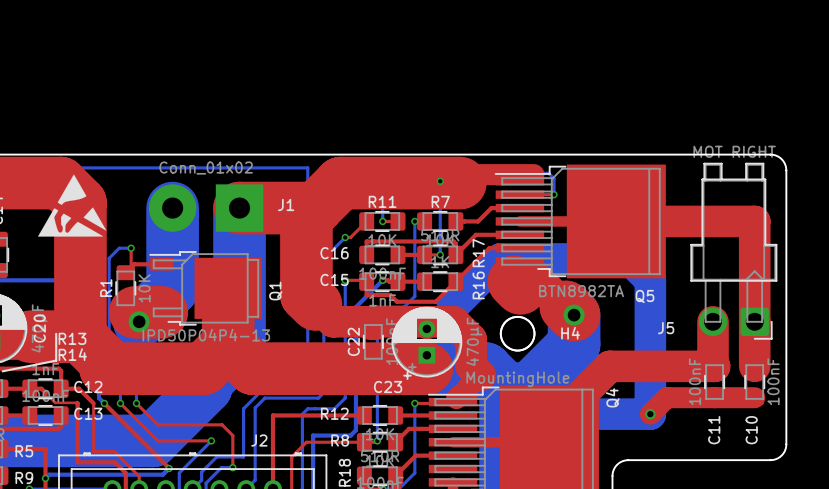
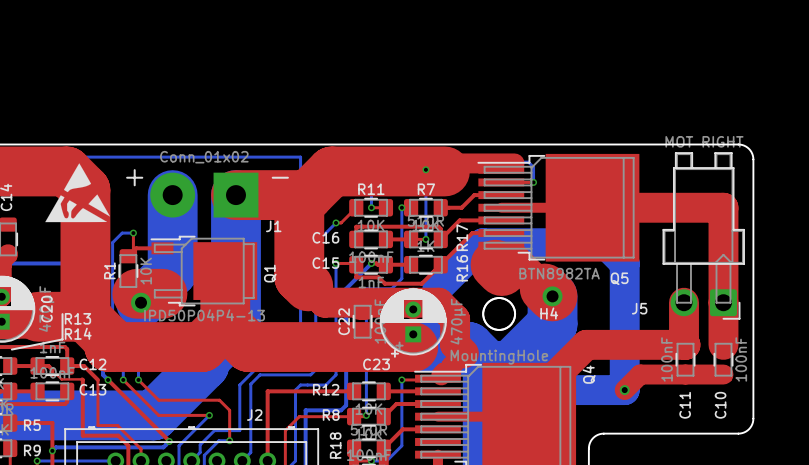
text: none -> + (134, 177)
text: none -> - (280, 177)
J1 name position: J1 (286, 205) -> J1 (273, 226)

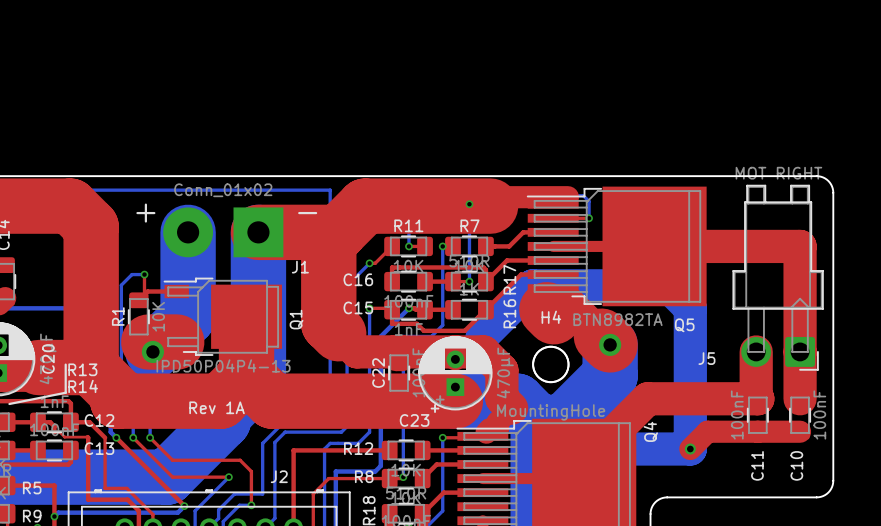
drawing: [45, 163, 111, 223] -> none
H4 name position: H4 (549, 313) -> H4 (551, 317)
text: none -> Rev 1A (217, 407)

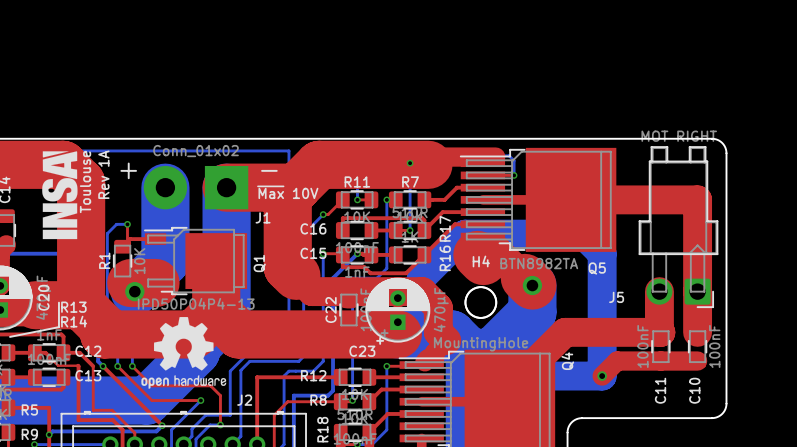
drawing: none -> [42, 151, 78, 240]
text: none -> Toulouse (85, 181)
text: none -> ~{Max} 10V (287, 192)
drawing: none -> [141, 317, 227, 389]
text rotation: 0° (217, 407) -> 90° counterclockwise (103, 174)
text position: Rev 1A (217, 407) -> Rev 1A (103, 174)

